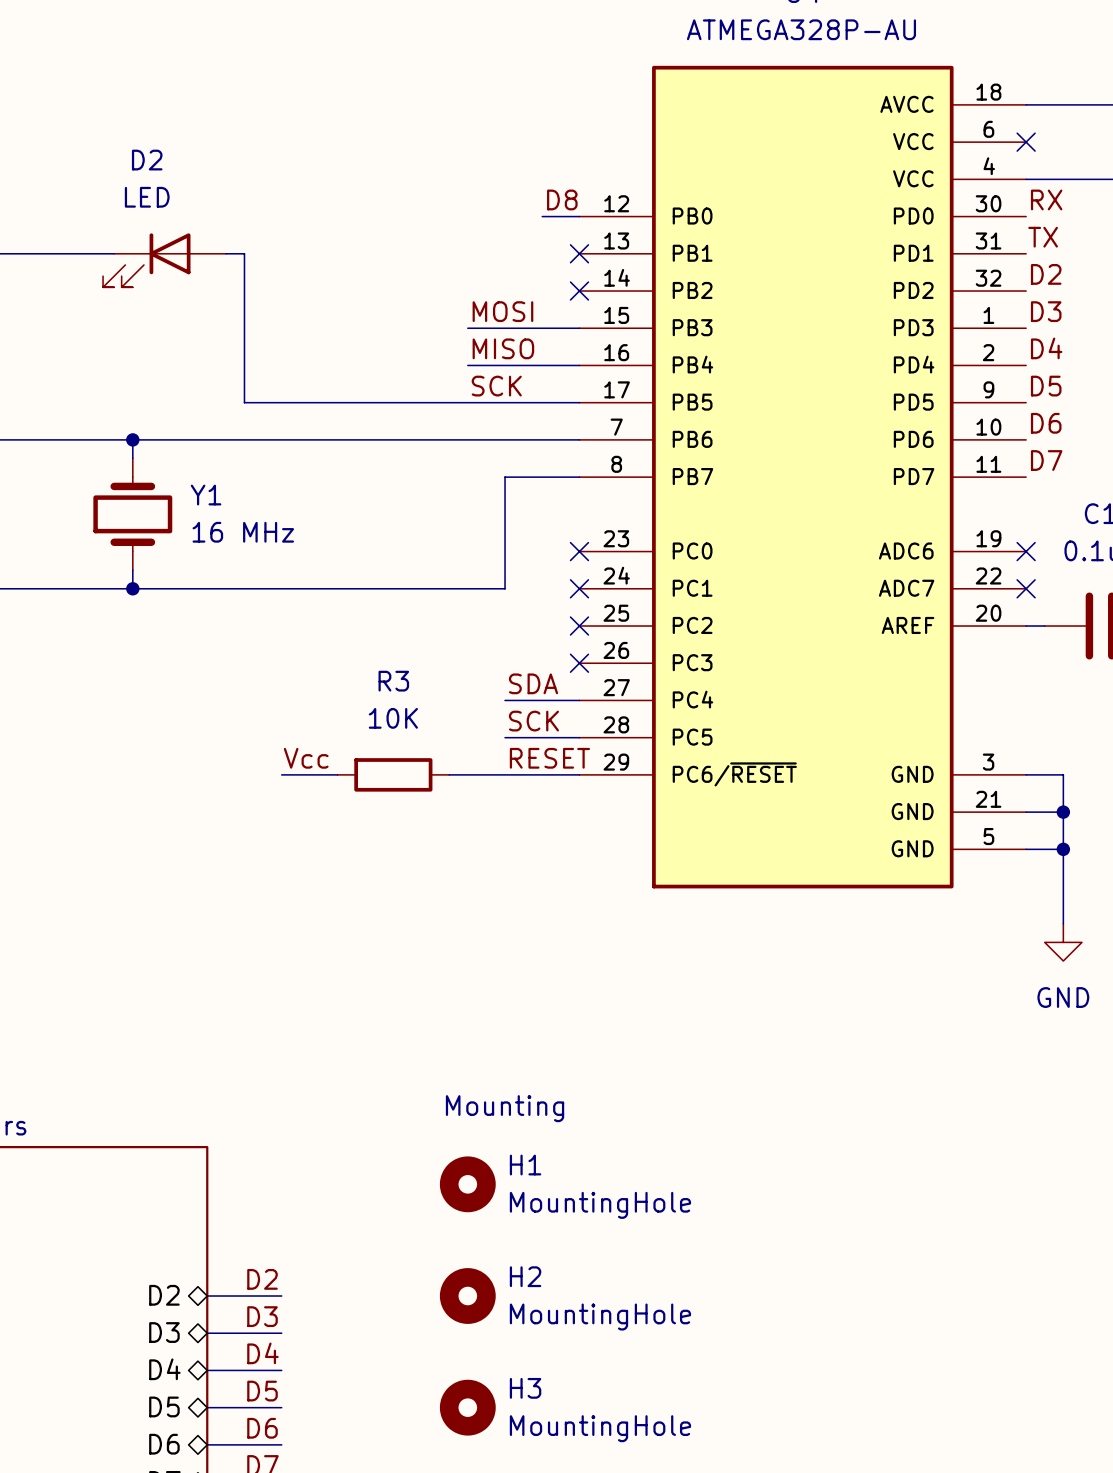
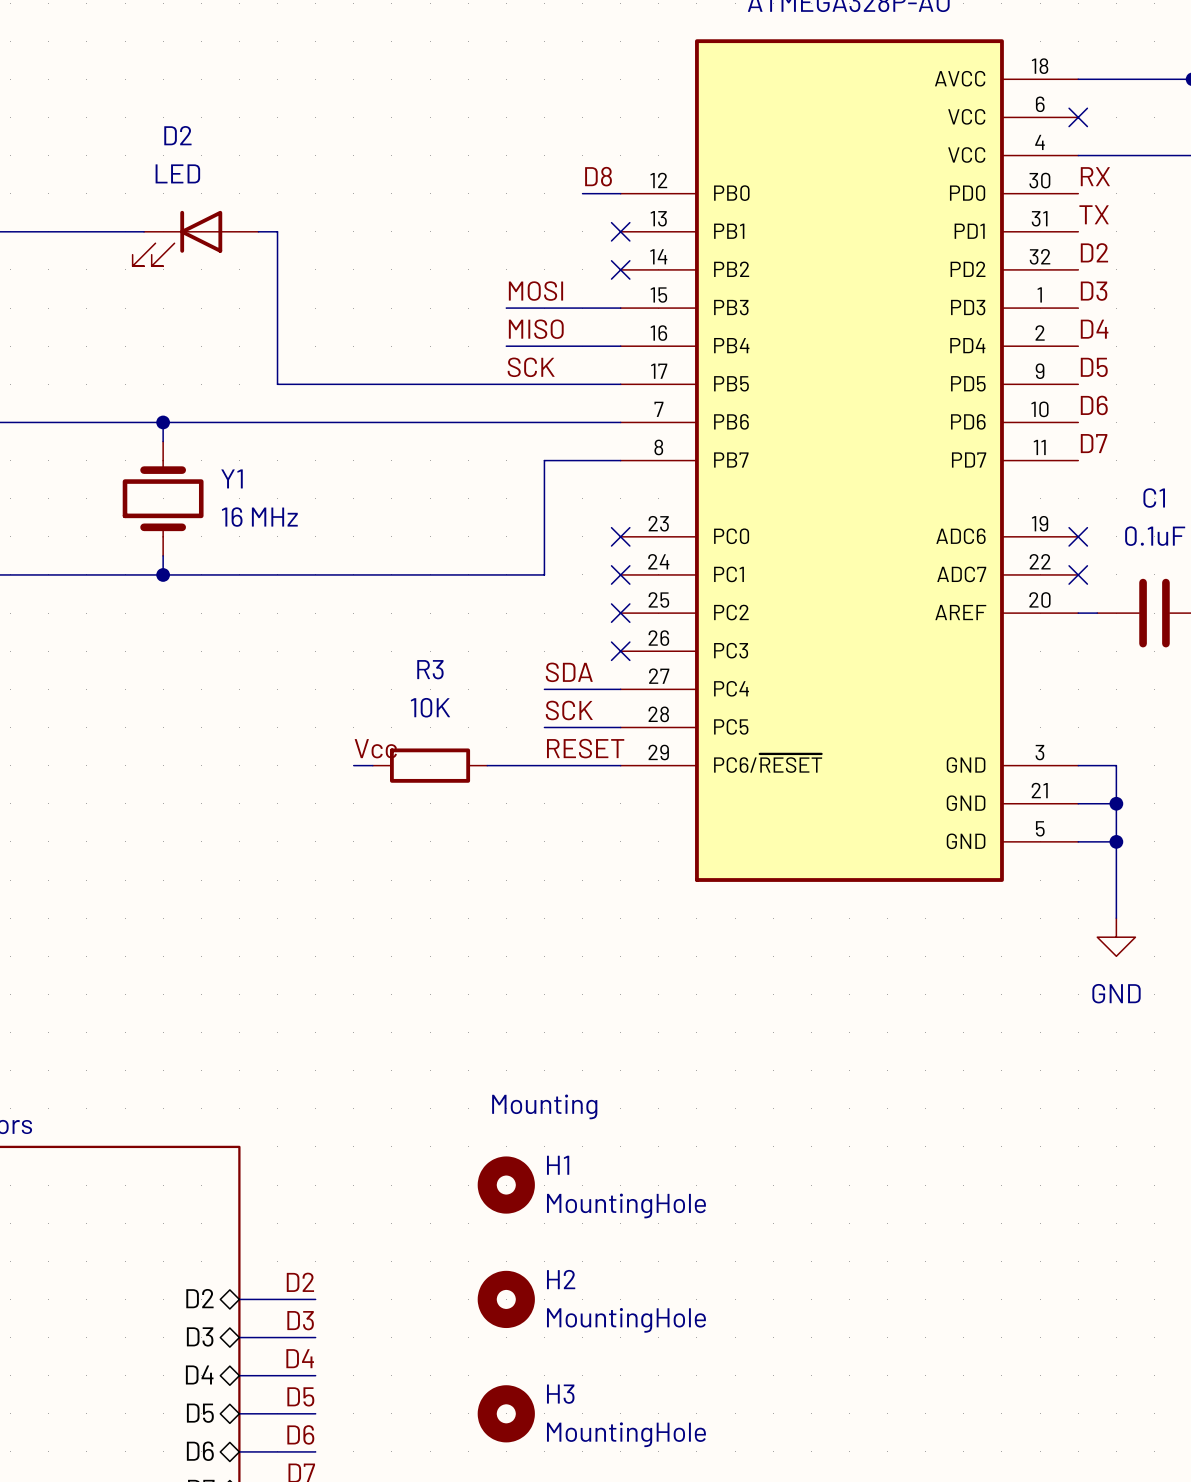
label position: Vcc (306, 758) -> Vcc (375, 748)
wire: (281, 774) (318, 774) -> none

